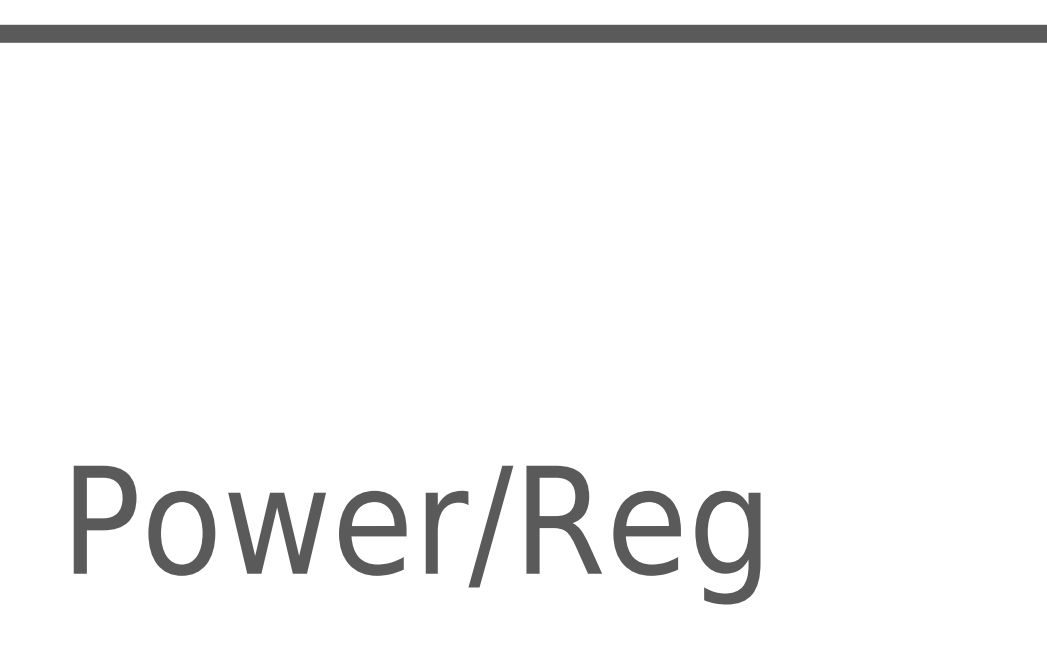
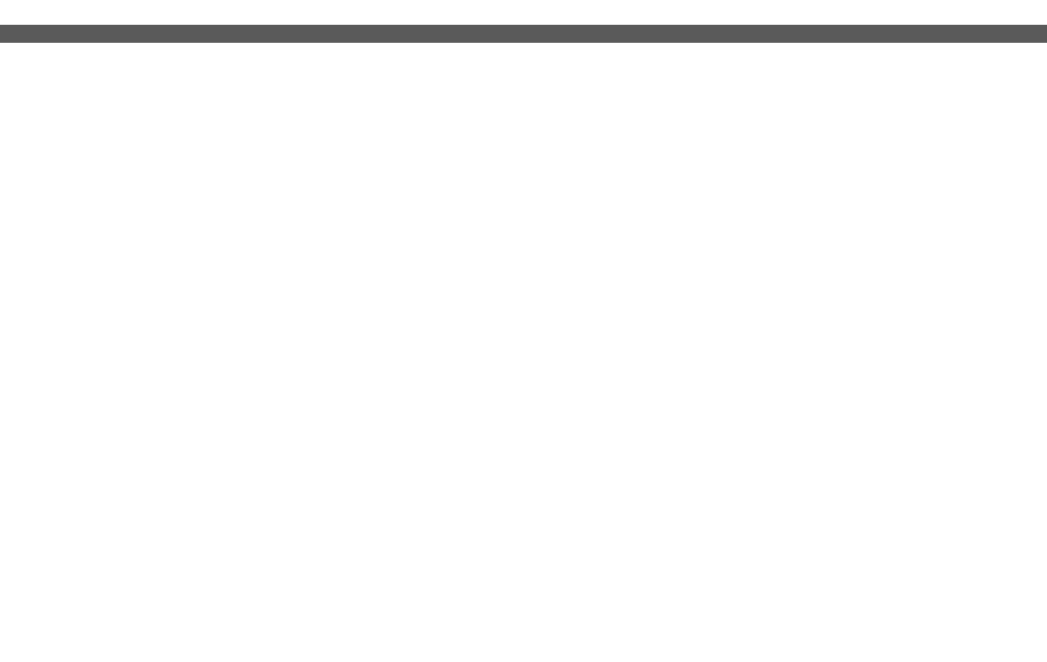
text: Power/Reg (417, 535) -> none

